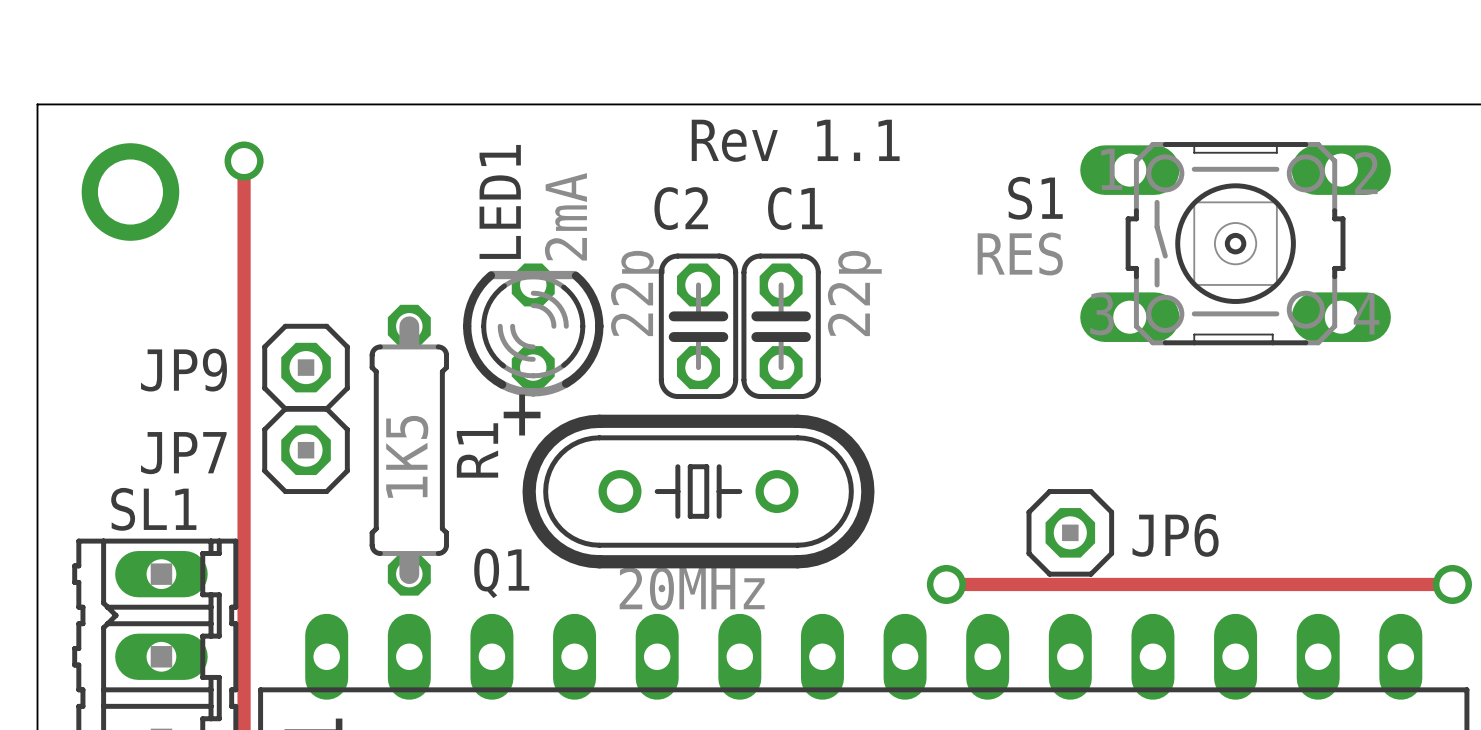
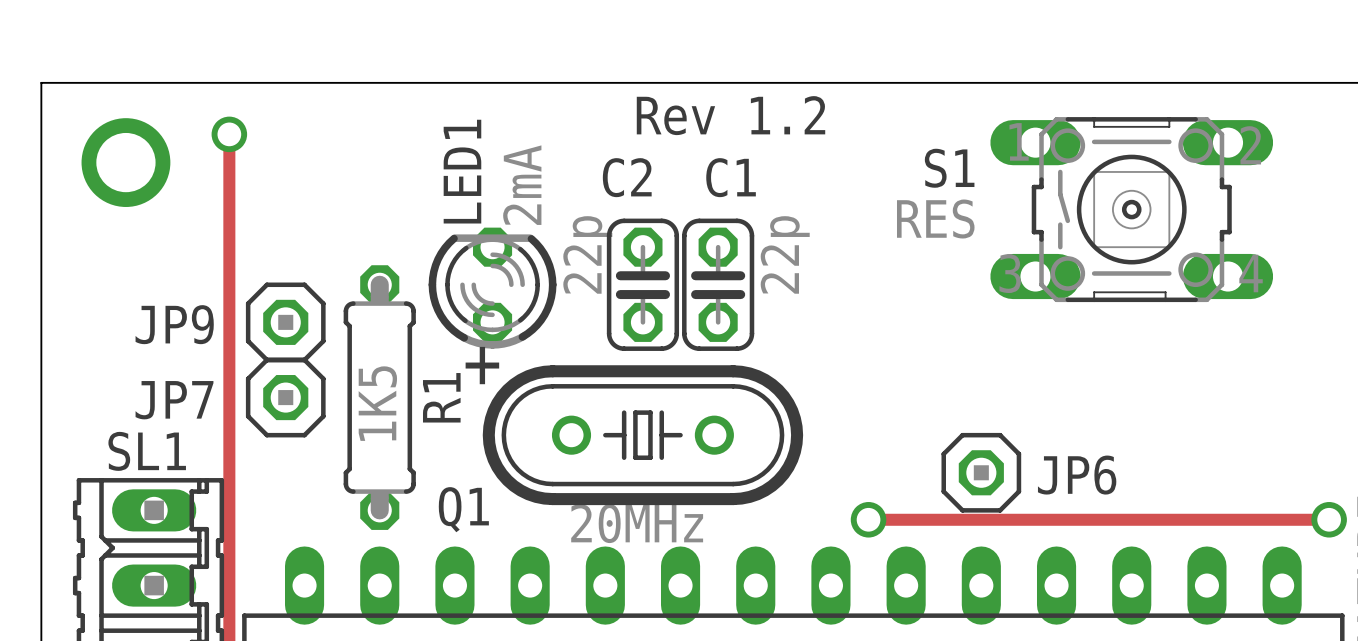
text: Rev 1.1 (795, 140) -> Rev 1.2 (731, 115)

